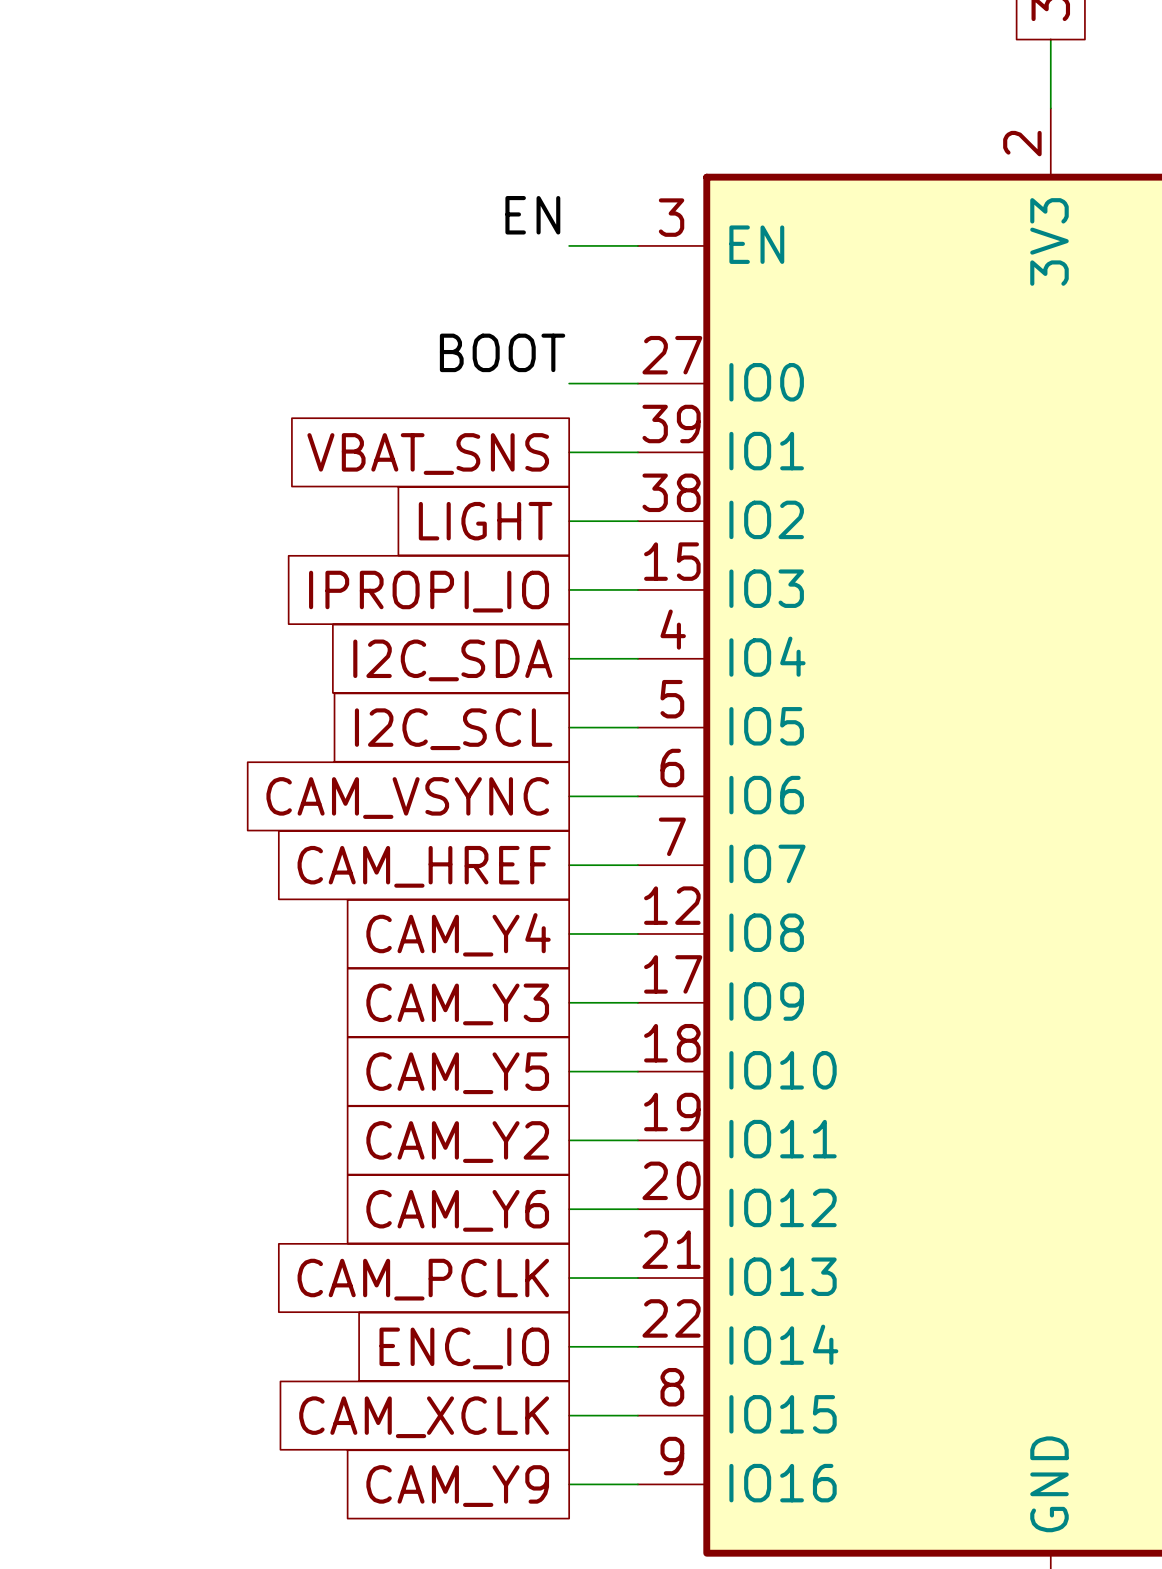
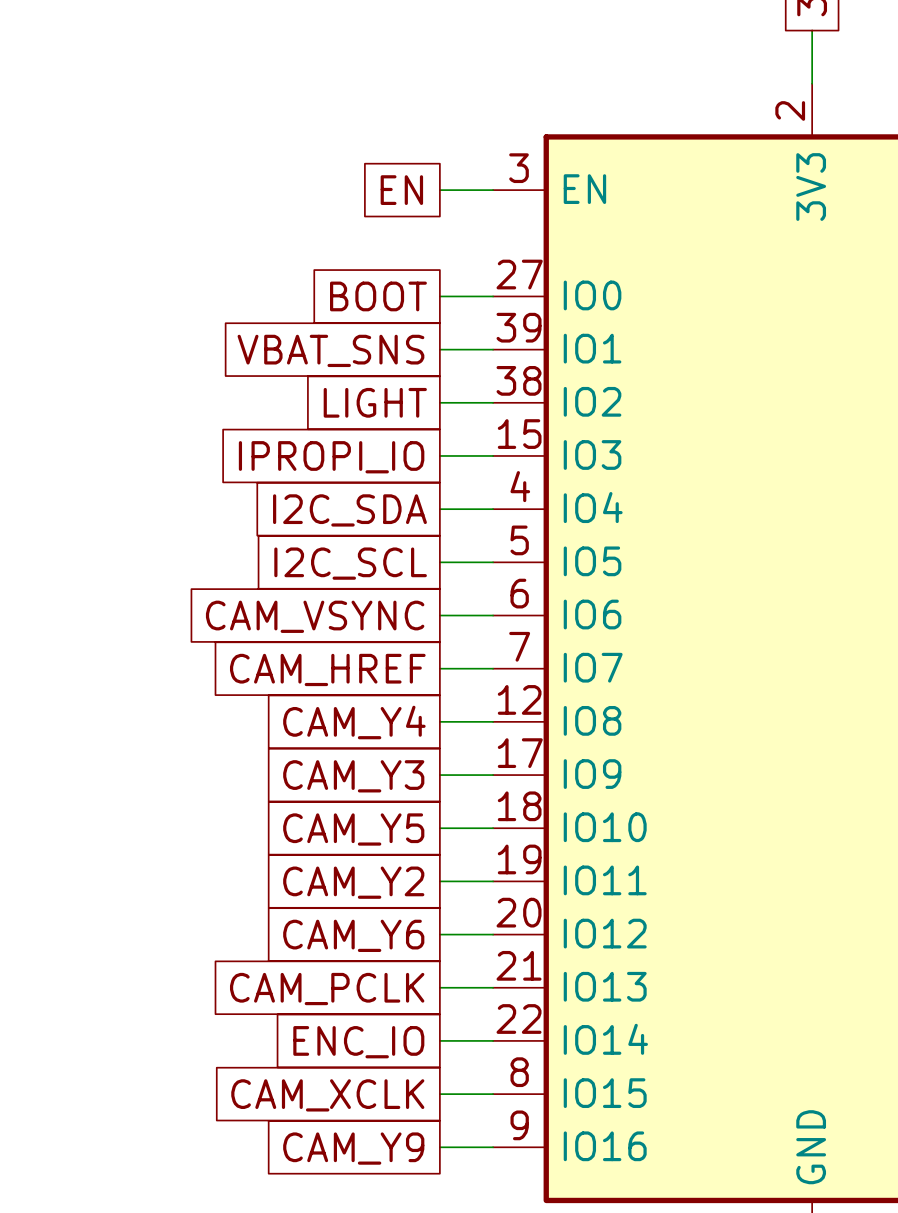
label: EN (532, 215) -> none
global label: none -> EN (401, 190)
label: BOOT (502, 352) -> none
global label: none -> BOOT (378, 296)

